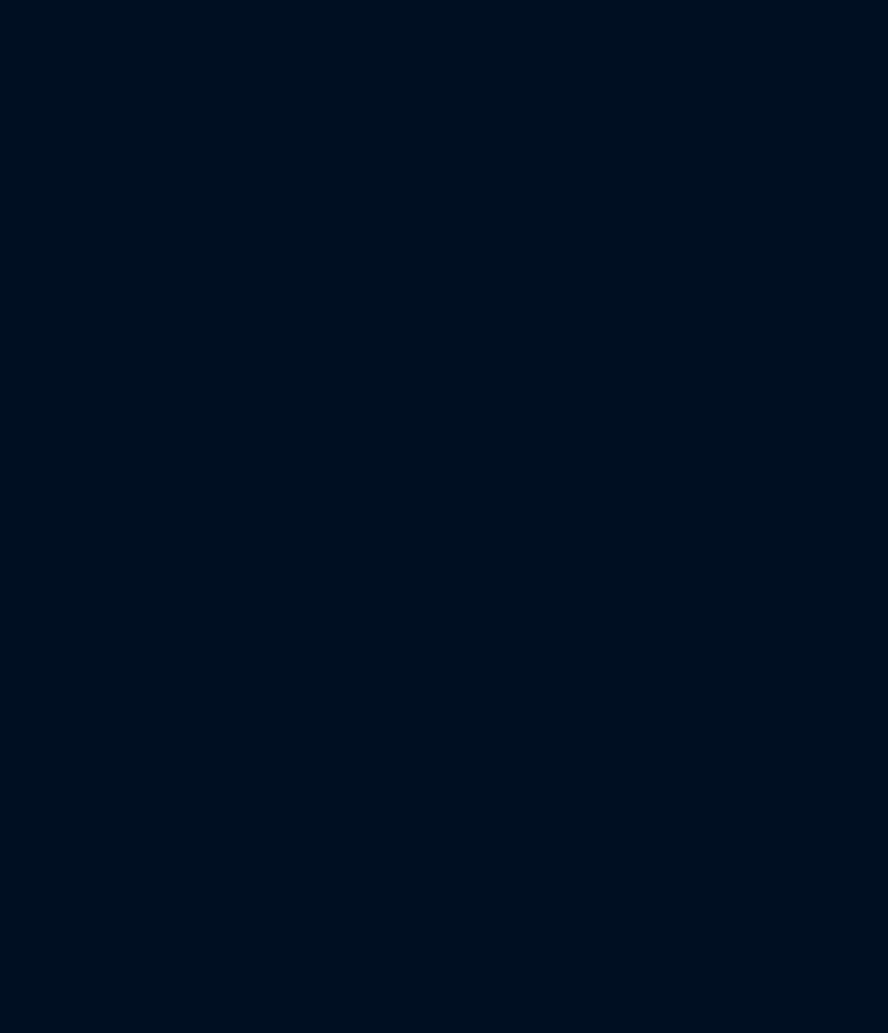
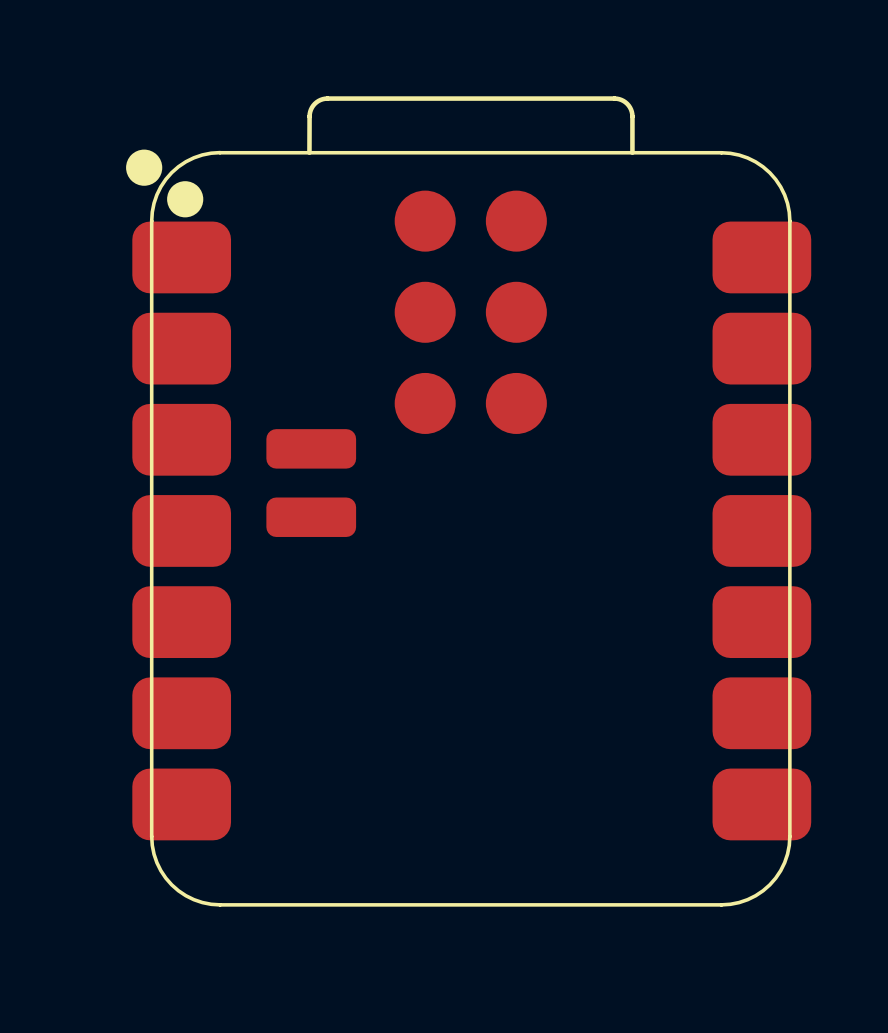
part: none -> (468, 501)

